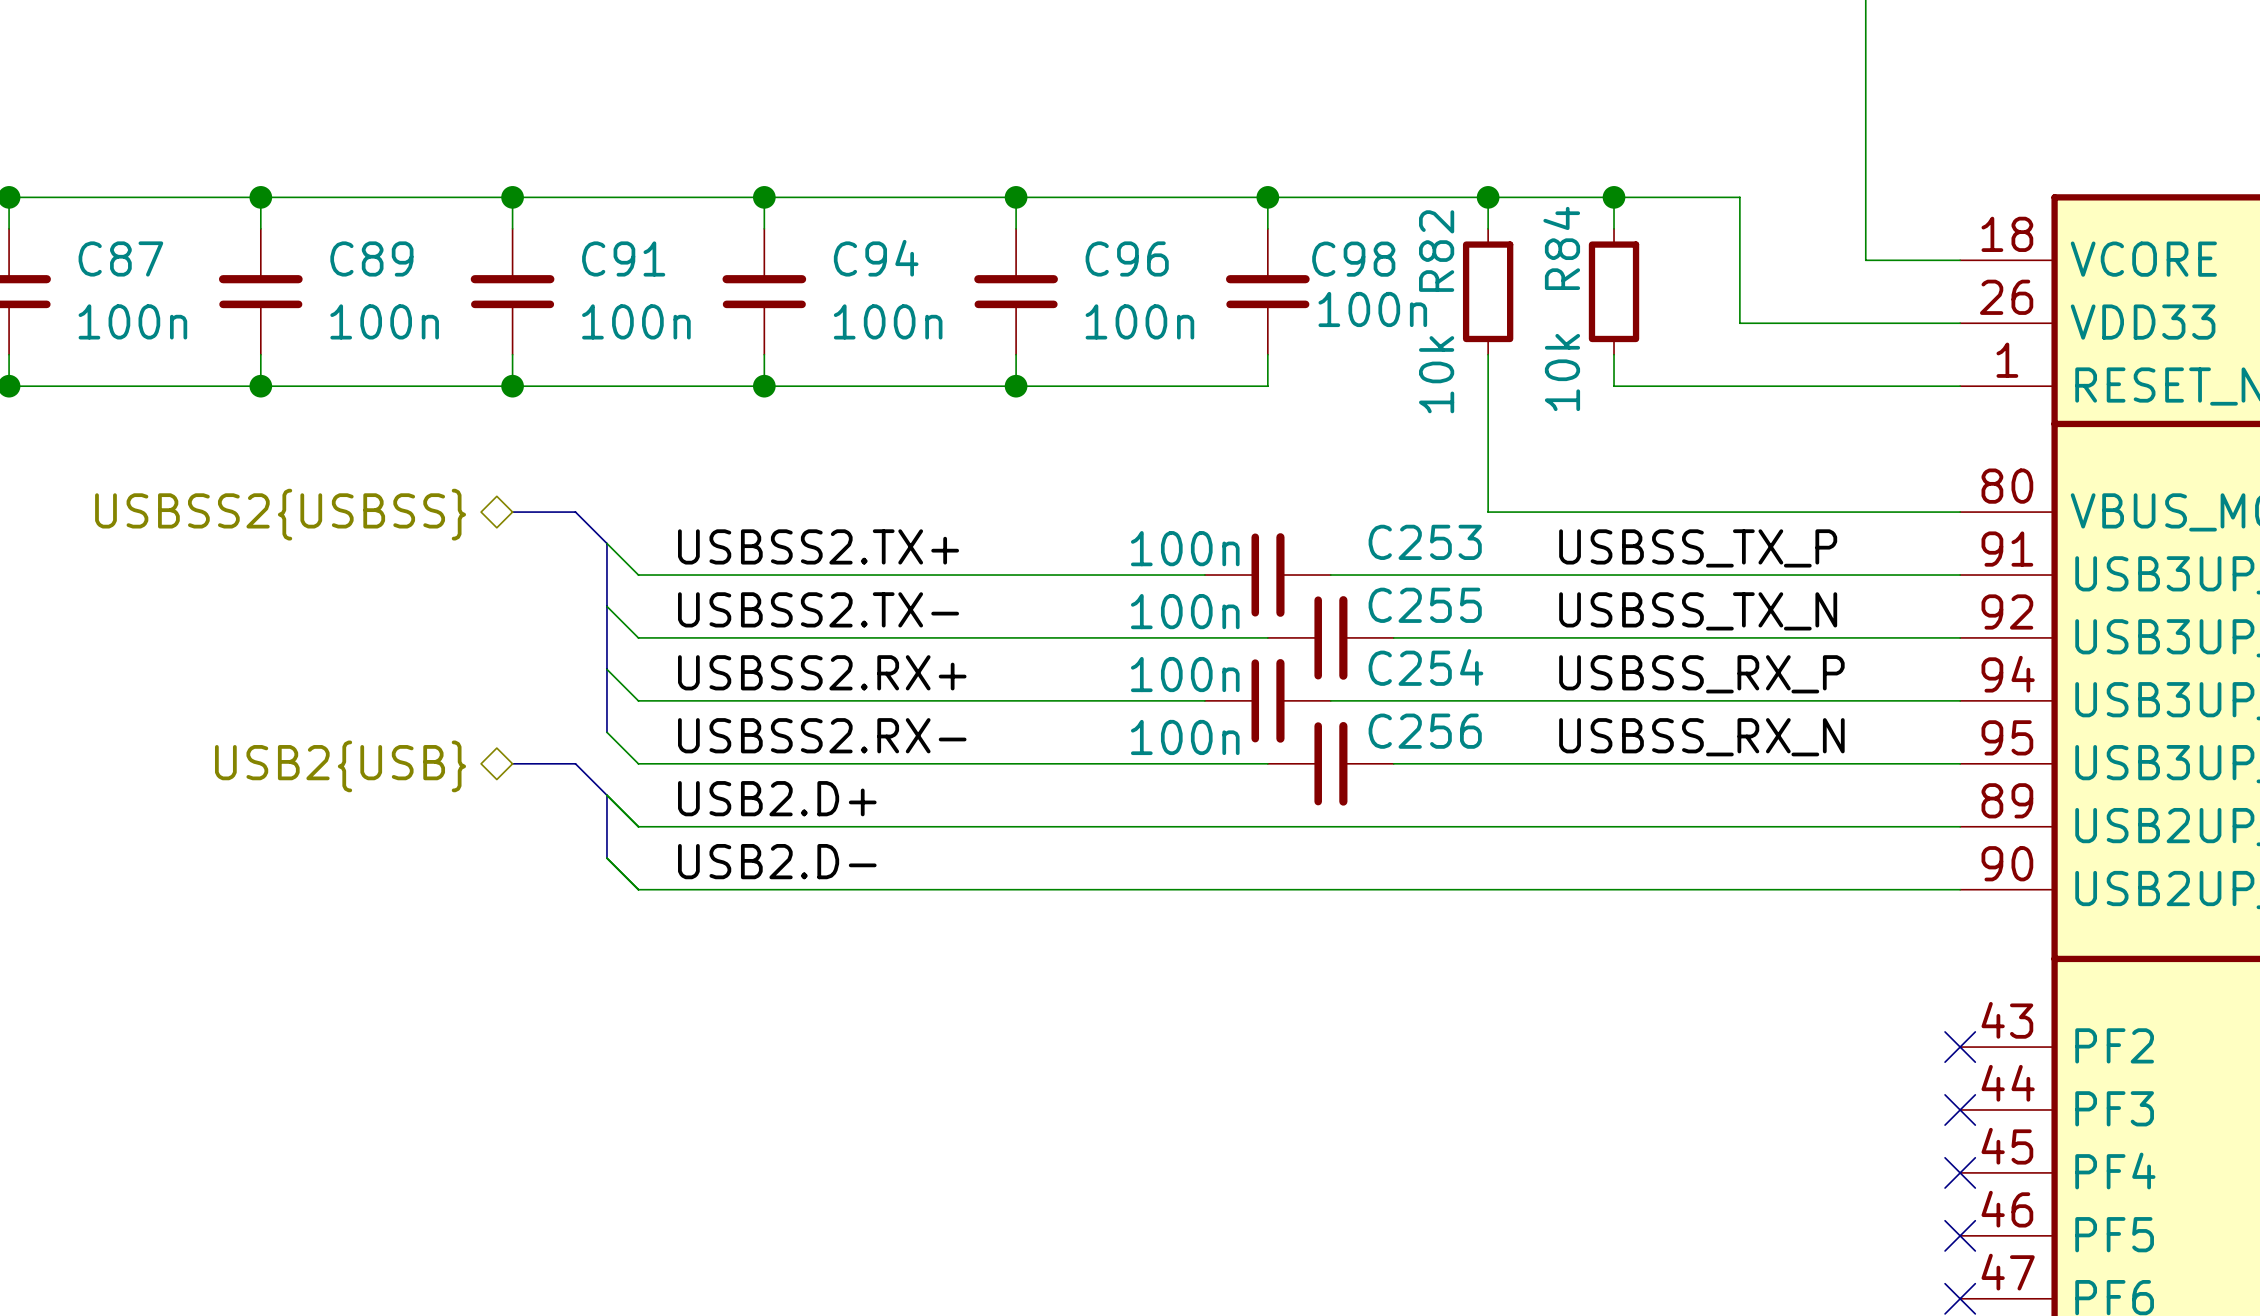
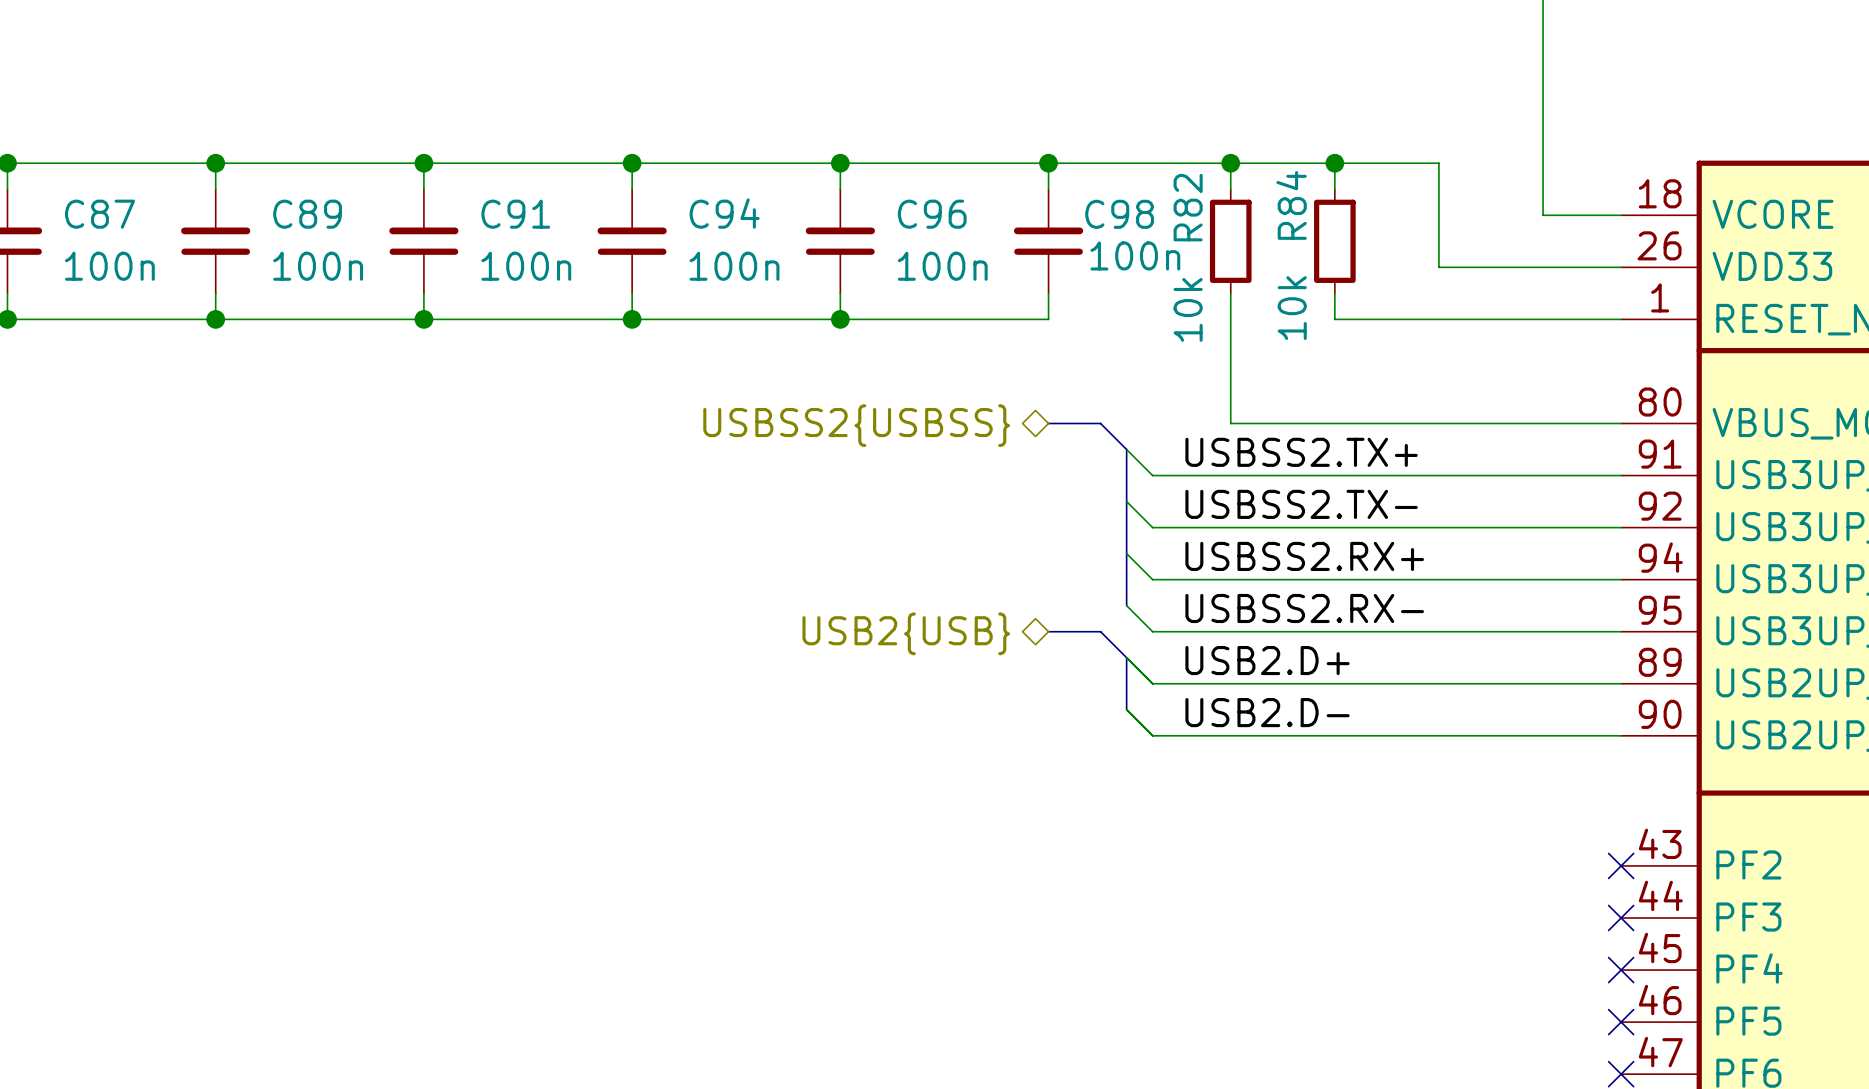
bus: (512, 512) (575, 512) (606, 543) (606, 732) -> none
bus: none -> (1048, 423) (1100, 423) (1126, 449) (1126, 605)
hierarchical label: USBSS2{USBSS} (280, 514) -> none
hierarchical label: none -> USBSS2{USBSS} (856, 425)
wire: (606, 543) (638, 575) (1204, 575) -> none
label: USBSS2.TX+ (818, 546) -> none
label: none -> USBSS2.TX+ (1301, 452)
label: USBSS_TX_P (1698, 548) -> none
C253: (1267, 575) -> none
wire: (1330, 575) (1393, 575) -> (1126, 449) (1152, 475)
wire: (606, 606) (638, 637) (1267, 637) -> none
wire: none -> (1126, 501) (1152, 527)
label: USBSS2.TX- (818, 609) -> none
label: none -> USBSS2.TX- (1301, 504)
label: USBSS_TX_N (1698, 611) -> none
C255: (1330, 637) -> none
wire: (606, 669) (638, 700) (1204, 700) -> none
label: USBSS2.RX+ (822, 672) -> none
label: none -> USBSS2.RX+ (1304, 556)
label: USBSS_RX_P (1701, 674) -> none
C254: (1267, 700) -> none
wire: (1330, 700) (1393, 700) -> (1126, 553) (1152, 579)
wire: (606, 732) (638, 763) (1267, 763) -> none
wire: none -> (1126, 605) (1152, 631)
label: USBSS2.RX- (822, 735) -> none
label: none -> USBSS2.RX- (1304, 608)
label: USBSS_RX_N (1701, 737) -> none
bus: (512, 763) (575, 763) (606, 795) (606, 858) -> none
bus: none -> (1048, 631) (1100, 631) (1126, 657) (1126, 709)
C256: (1330, 763) -> none
hierarchical label: USB2{USB} (340, 766) -> none
hierarchical label: none -> USB2{USB} (906, 633)
wire: (606, 795) (638, 826) (1393, 826) -> (1126, 657) (1152, 683)
label: USB2.D+ (777, 798) -> none
label: none -> USB2.D+ (1267, 660)
wire: (606, 858) (638, 889) (1393, 889) -> (1126, 709) (1152, 735)
label: USB2.D- (777, 861) -> none
label: none -> USB2.D- (1267, 712)

